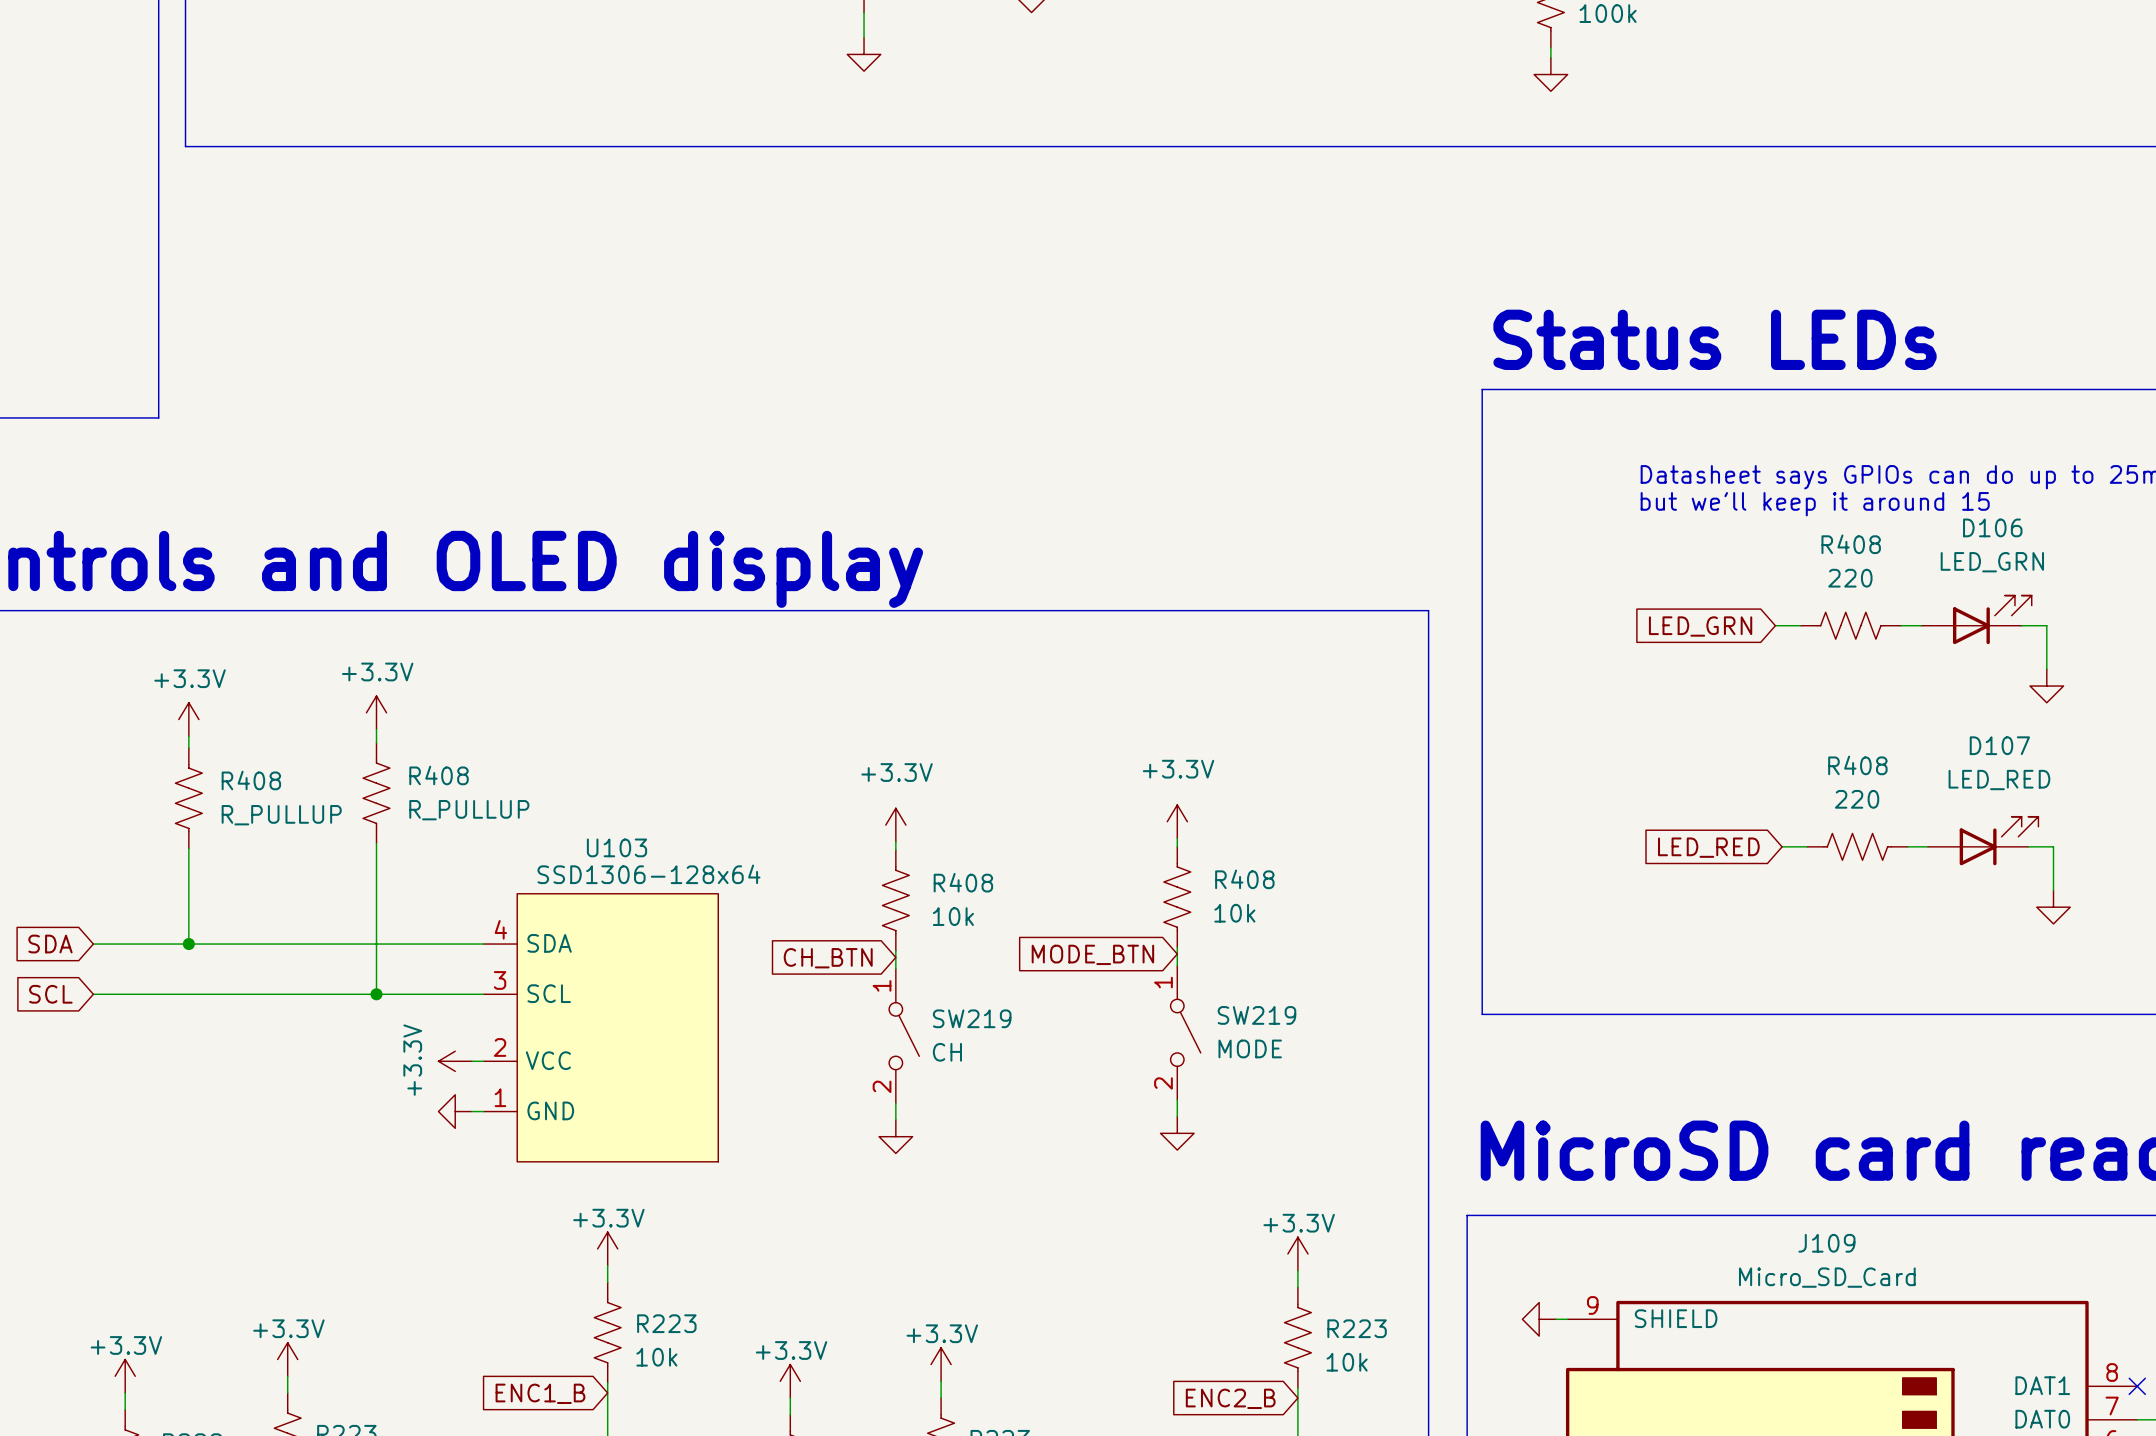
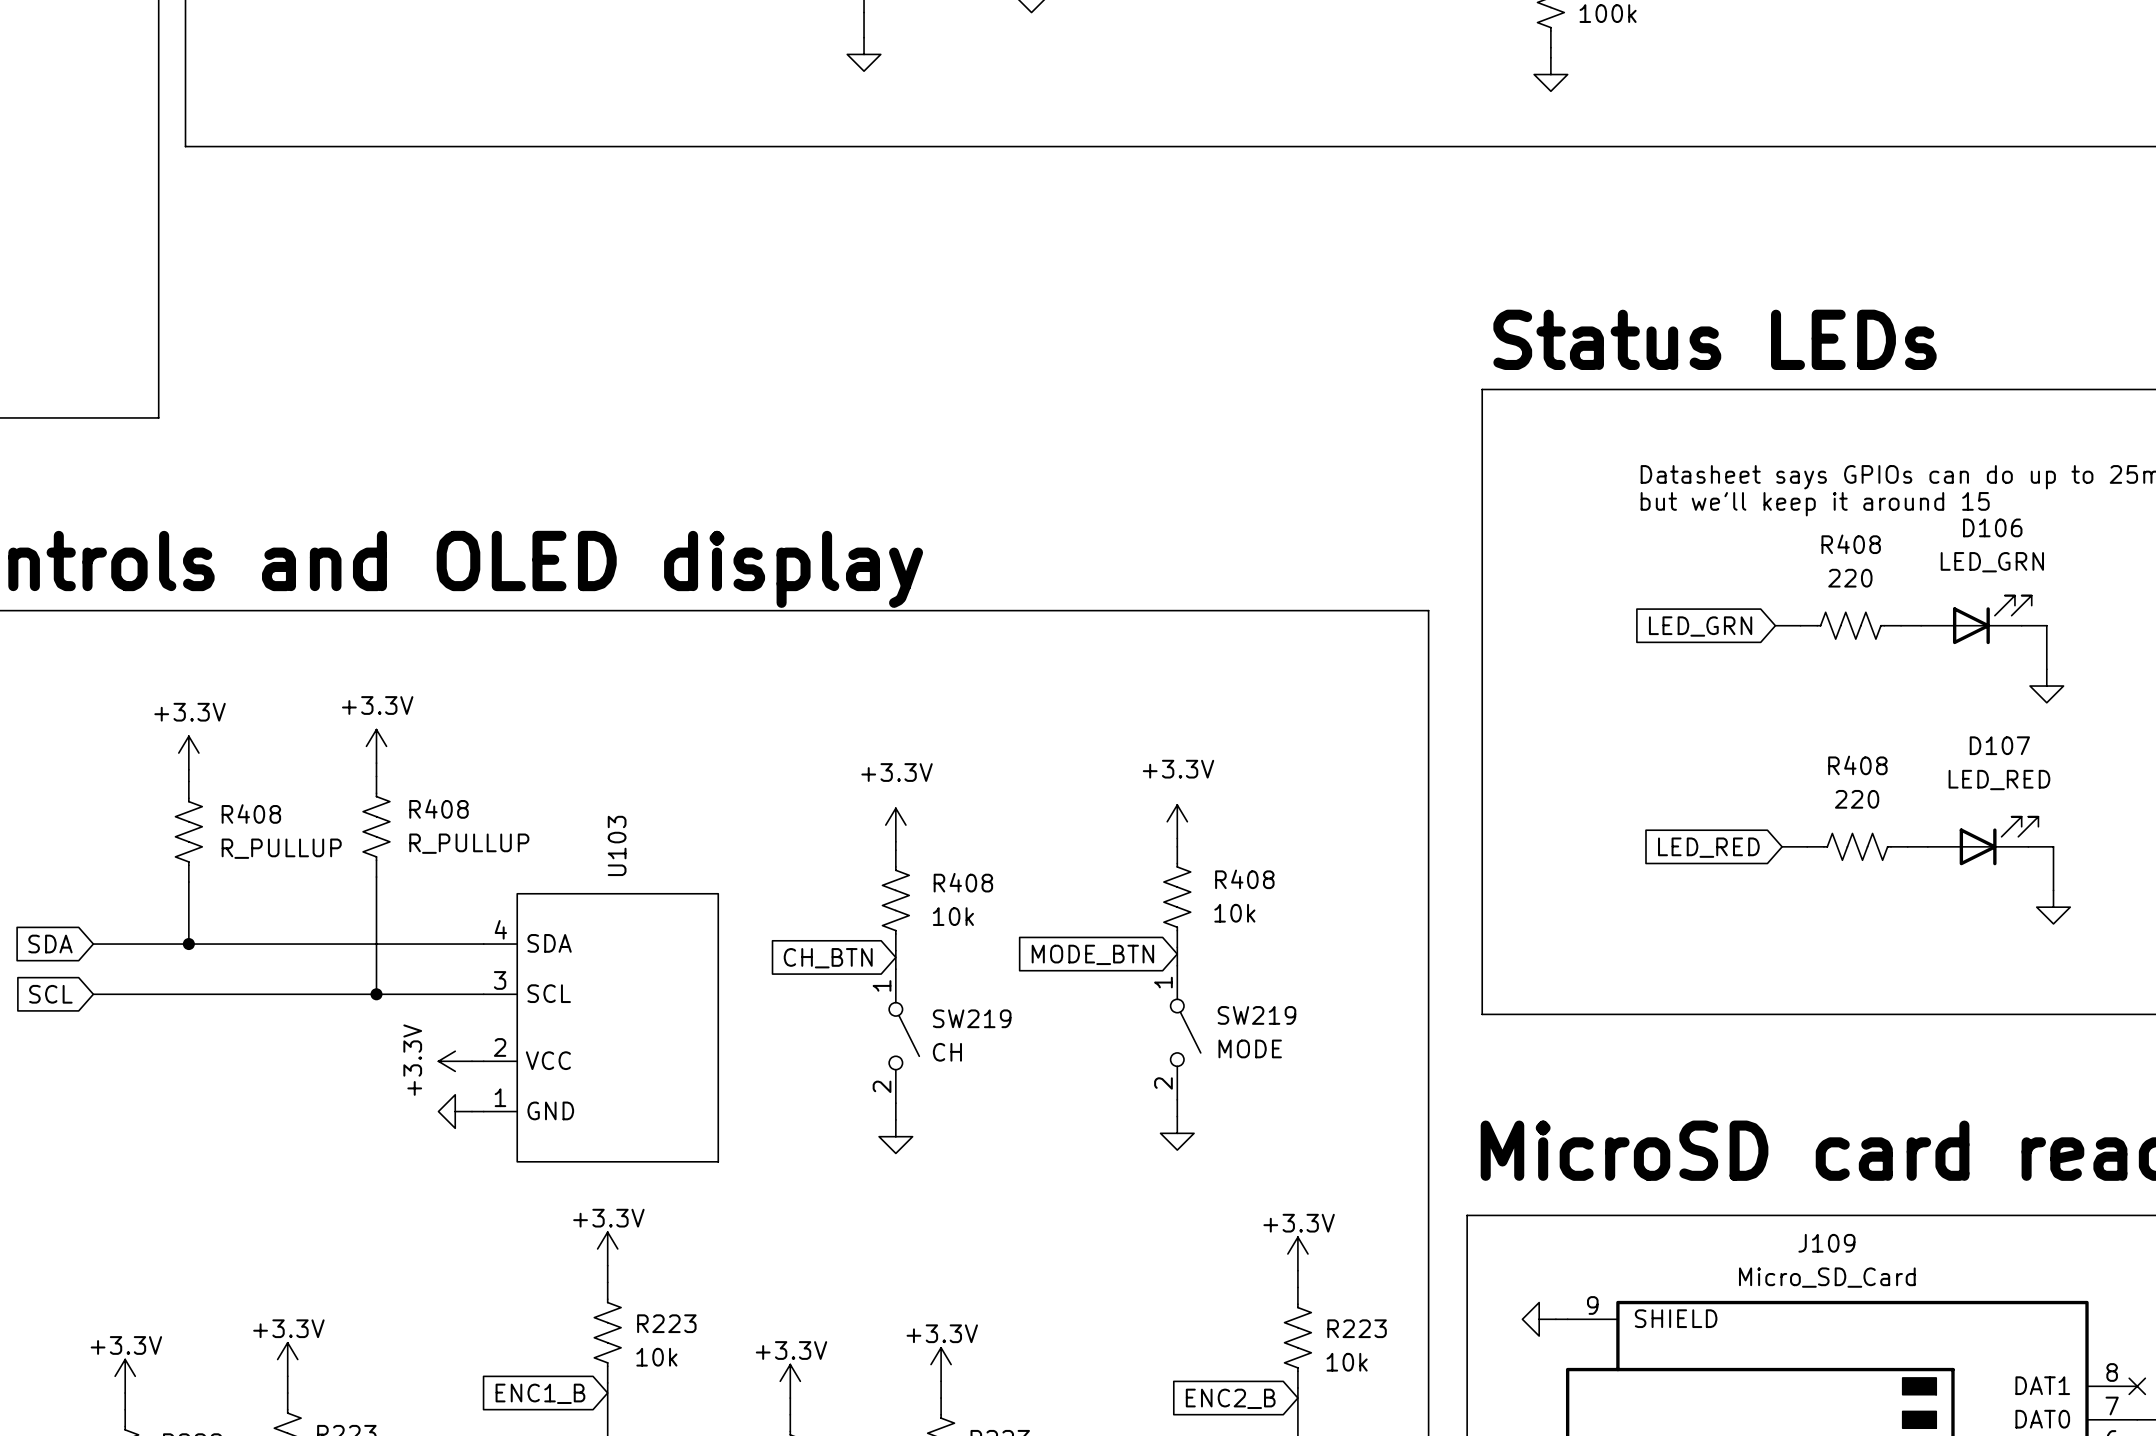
power symbol position: +3.3V (376, 712) -> +3.3V (376, 746)
power symbol position: +3.3V (188, 719) -> +3.3V (188, 753)
R408 position: (376, 793) -> (376, 826)
R408 position: (188, 798) -> (188, 831)
U103 name rotation: 0° (616, 847) -> 90° counterclockwise (617, 845)
U103 value: SSD1306-128x64 (648, 874) -> none

